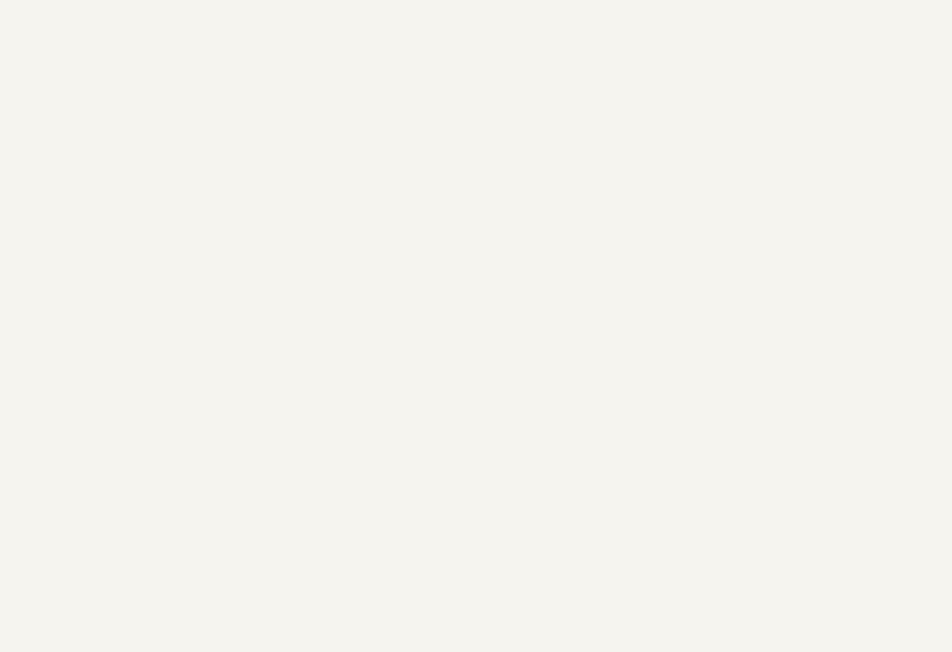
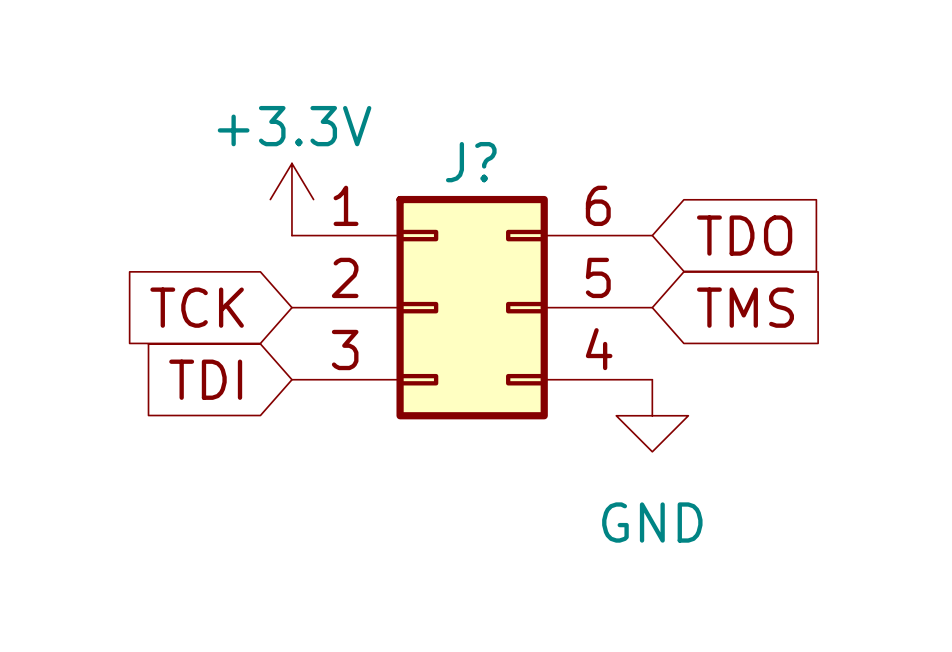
power symbol: none -> +3.3V (291, 199)
global label: none -> TDO (744, 235)
global label: none -> TCK (197, 307)
J?: none -> (472, 307)
global label: none -> TMS (745, 307)
global label: none -> TDI (205, 379)
power symbol: none -> GND (652, 415)

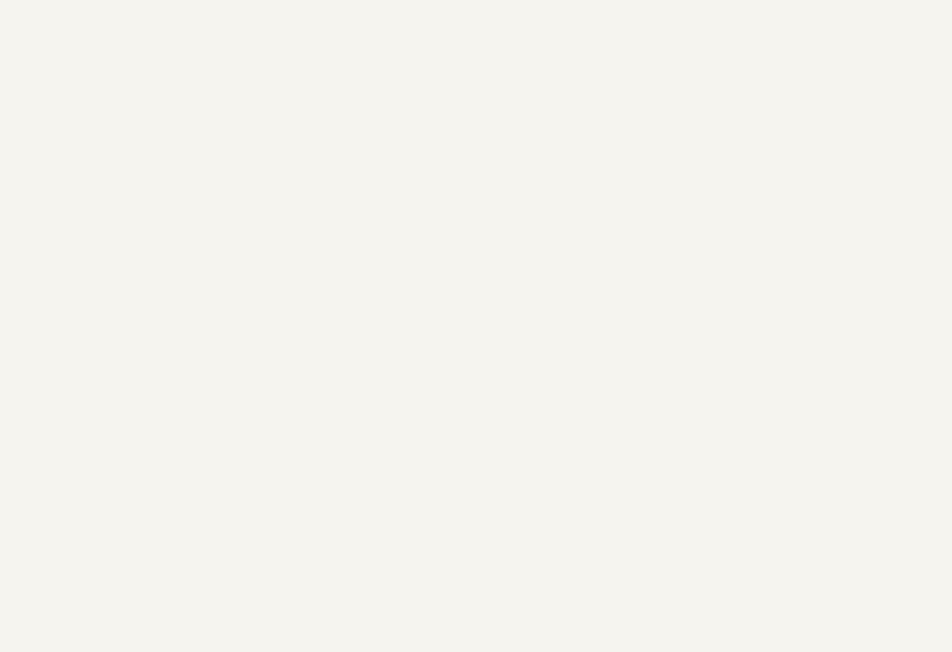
power symbol: +3.3V (291, 199) -> none
global label: TDO (744, 235) -> none
global label: TCK (197, 307) -> none
J?: (472, 307) -> none
global label: TMS (745, 307) -> none
global label: TDI (205, 379) -> none
power symbol: GND (652, 415) -> none

